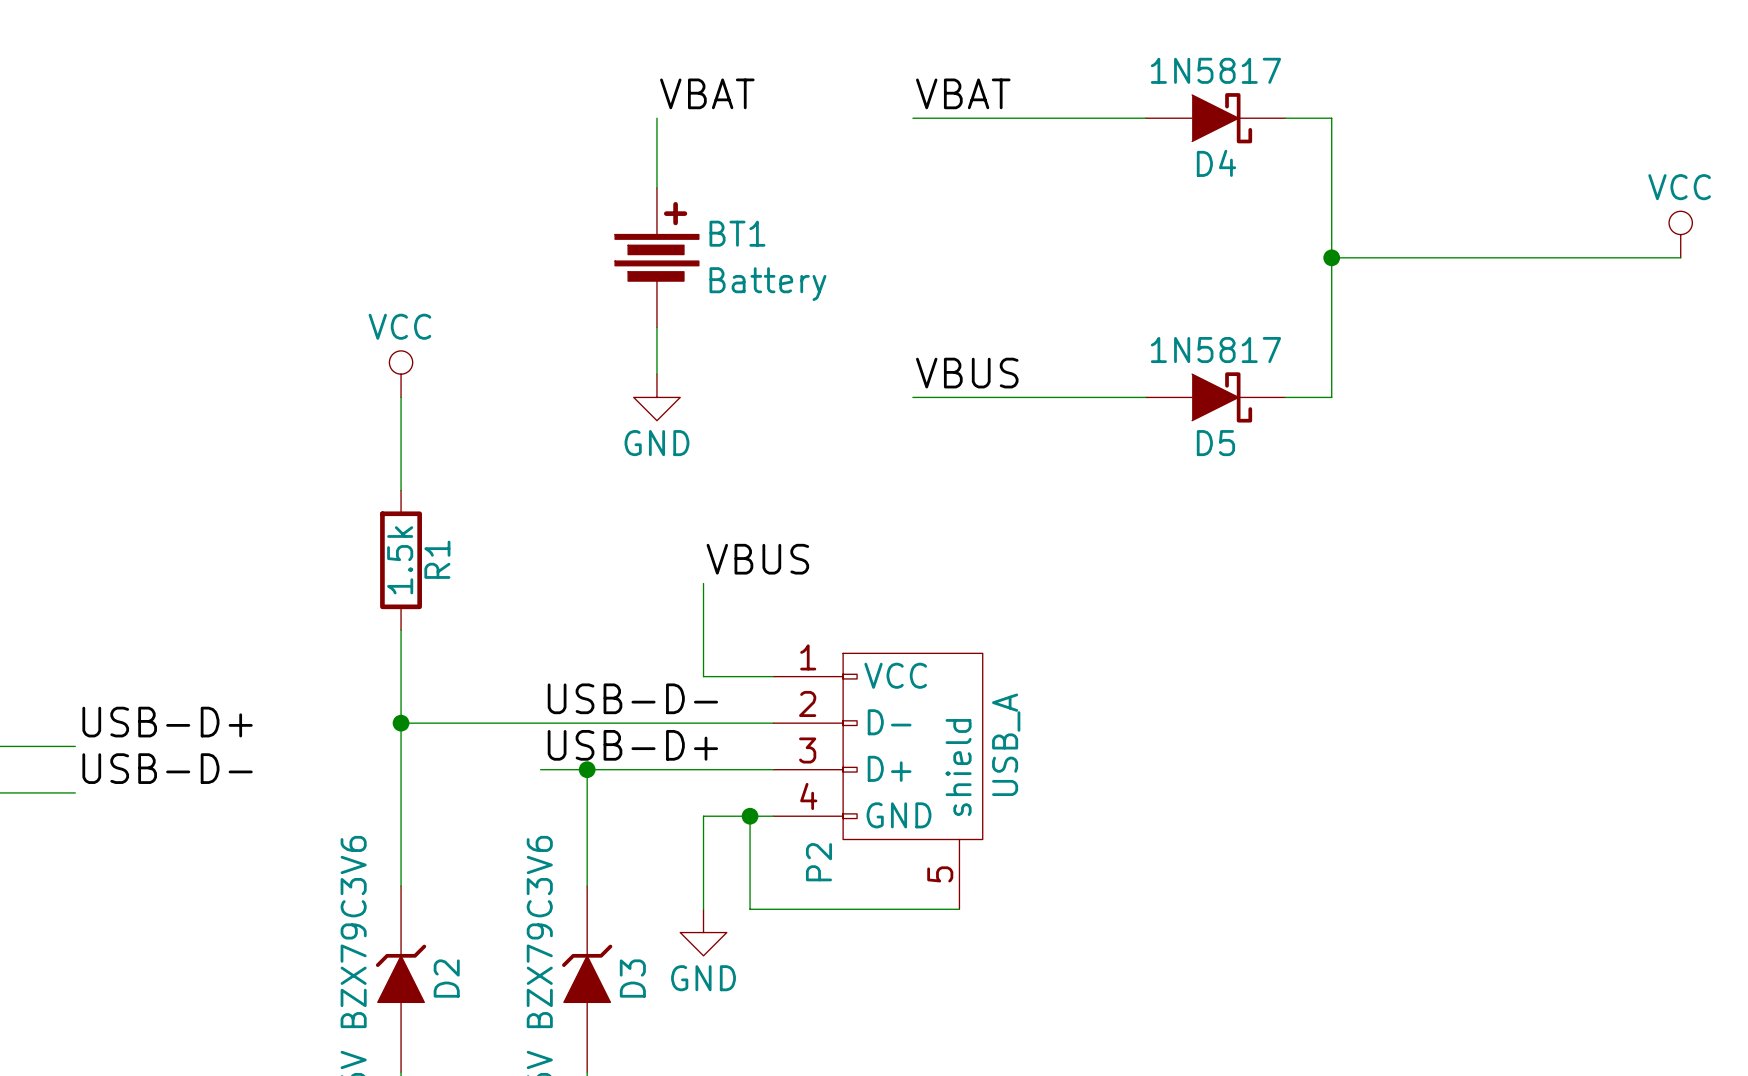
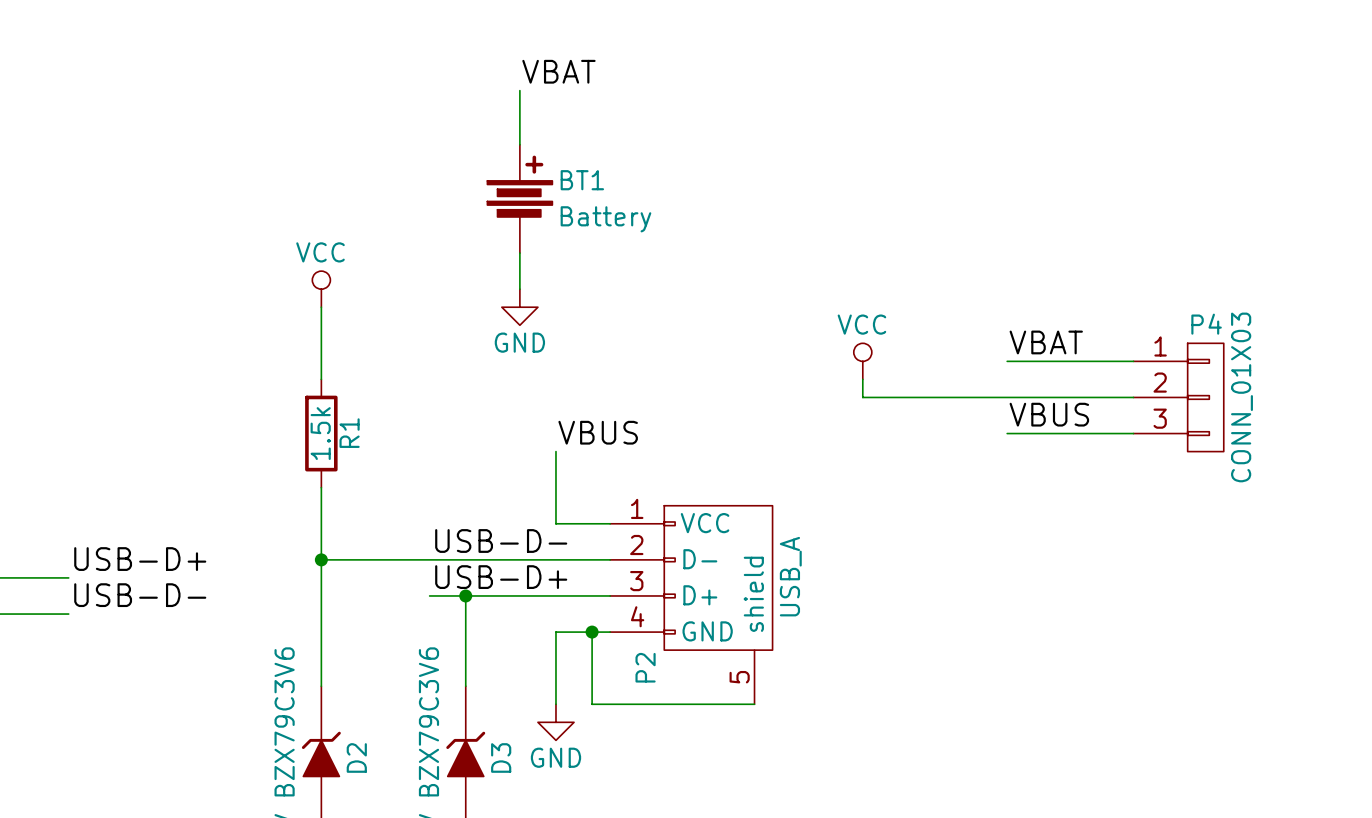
label: VBAT (963, 93) -> none
wire: (912, 118) (1145, 118) -> none
D4: 1N5817 (1215, 118) -> none
wire: (1285, 118) (1331, 118) (1331, 397) (1285, 397) -> none
power symbol: VCC (1680, 234) -> none
wire: (1331, 257) (1680, 257) -> none
junction: (1331, 257) -> none
label position: VBUS (967, 373) -> VBUS (1049, 414)
wire: (912, 397) (1145, 397) -> none
D5: 1N5817 (1215, 397) -> none
label: none -> VBAT (1046, 342)
power symbol: none -> VCC (862, 361)
wire: none -> (1007, 361) (1133, 361)
wire: none -> (862, 379) (862, 397) (1133, 397)
P4: none -> CONN_01X03 (1178, 397)
wire: none -> (1007, 433) (1133, 433)

